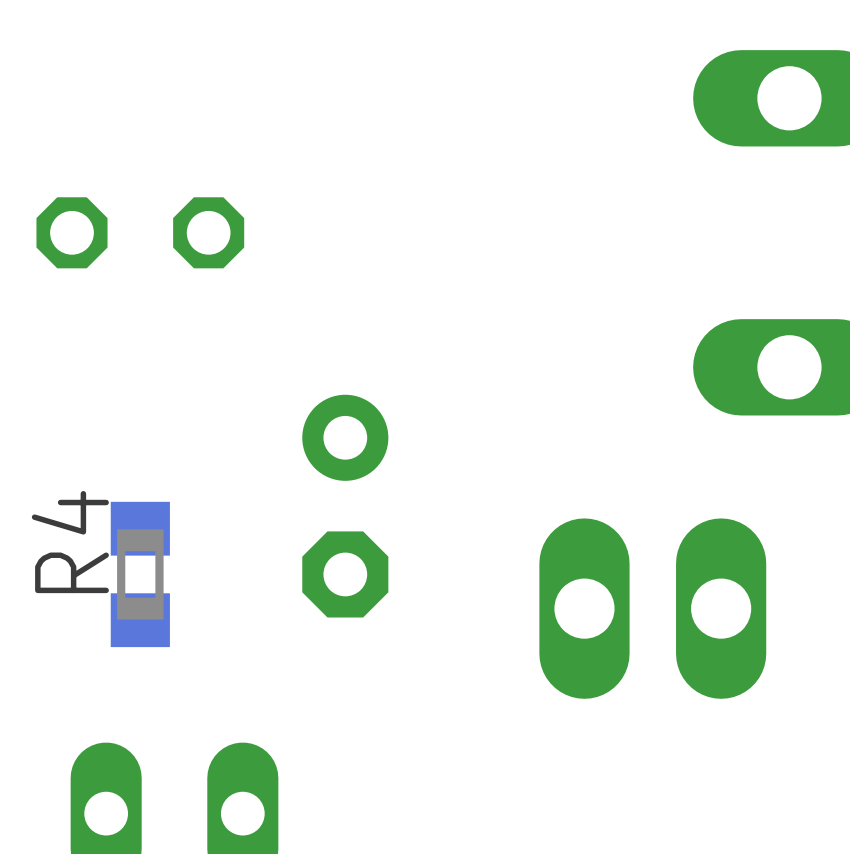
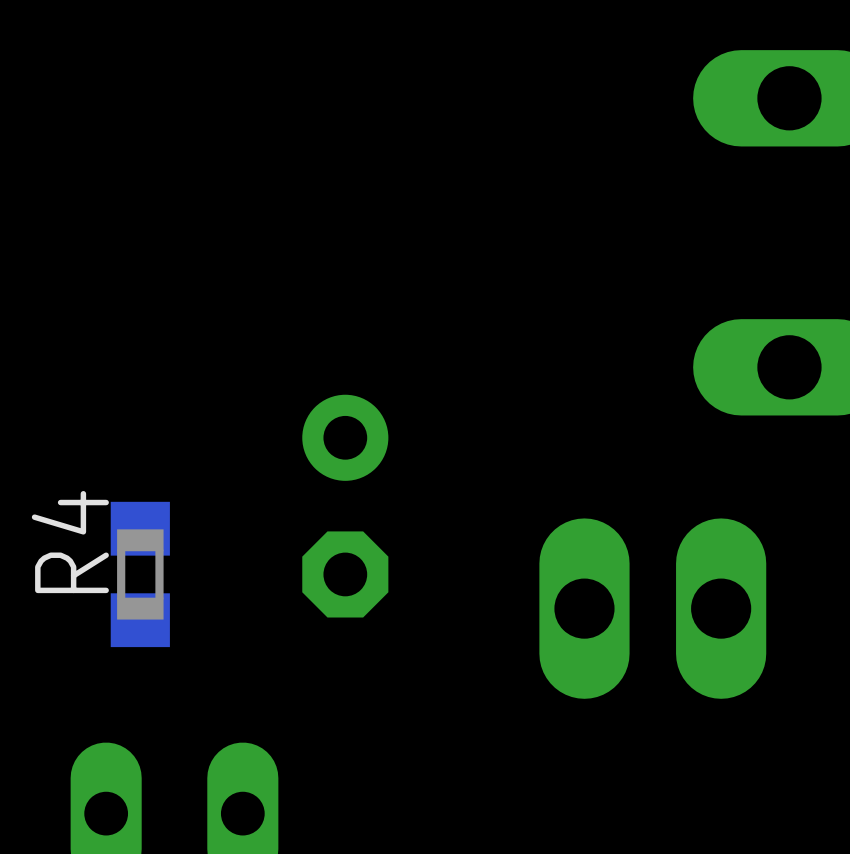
part: (140, 232) -> none

